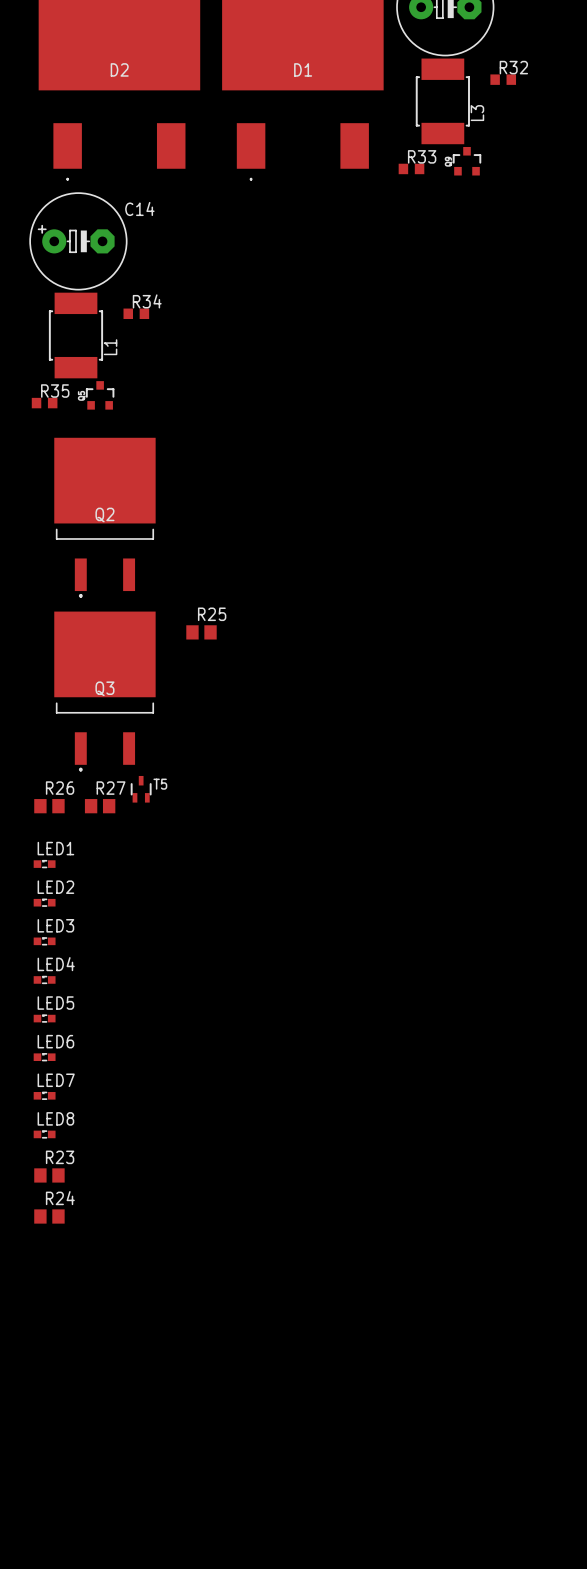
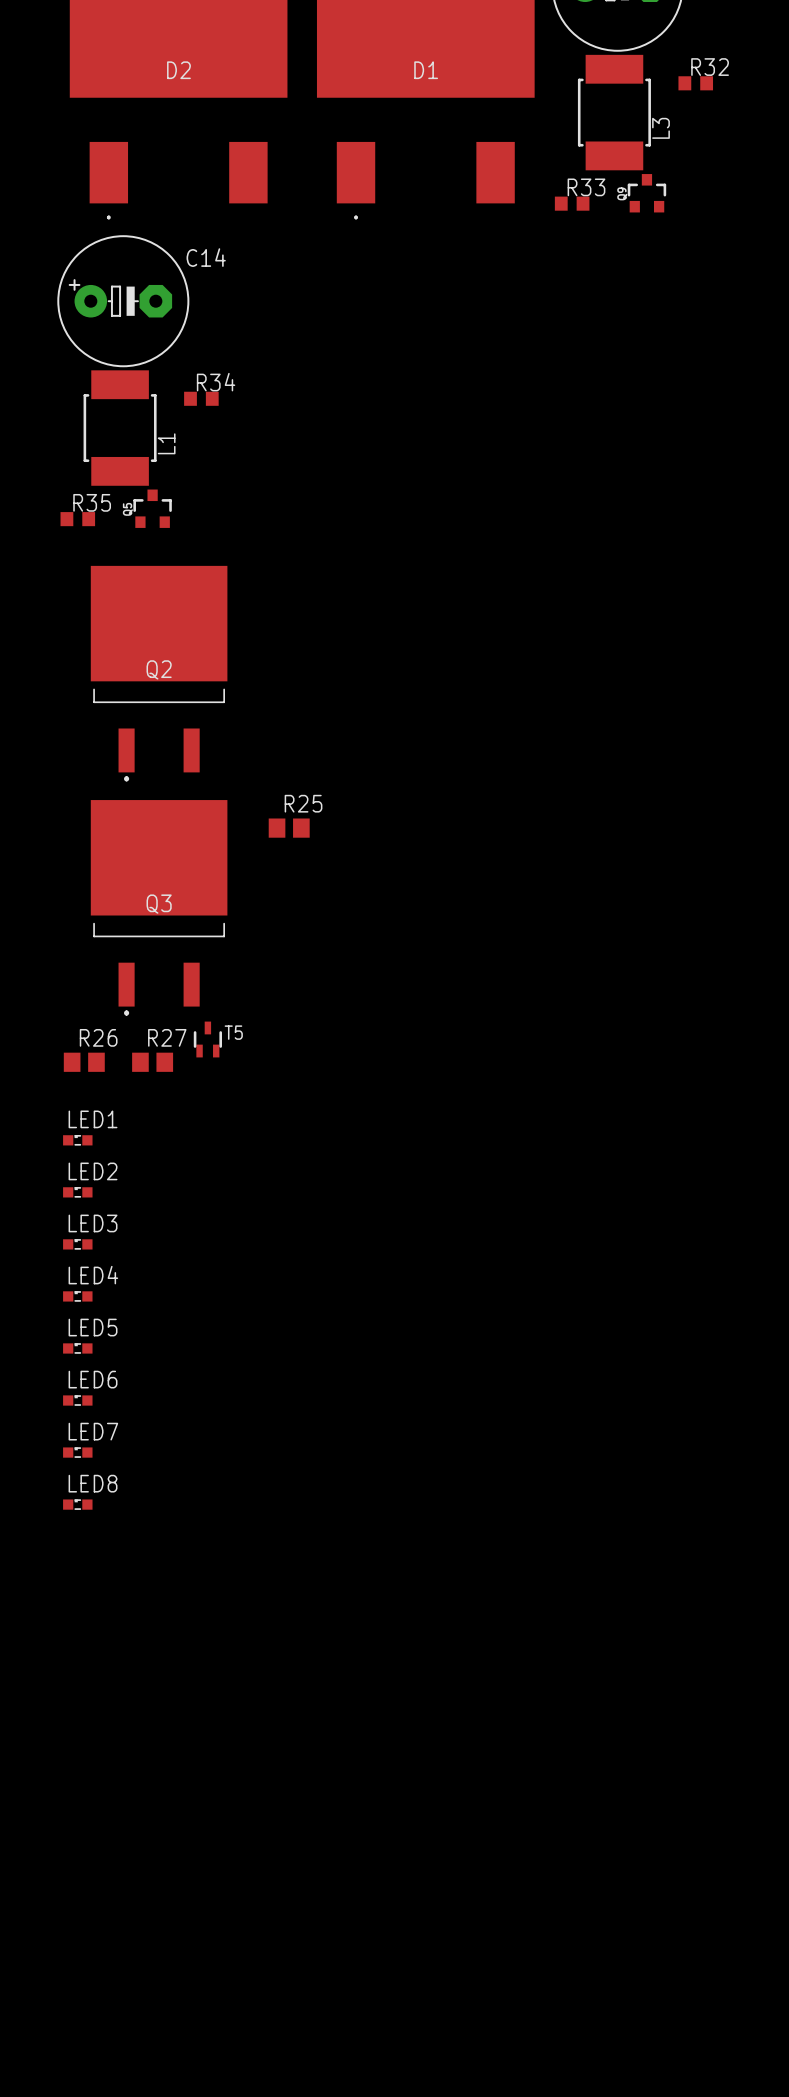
R23: (49, 1175) -> none
R24: (49, 1216) -> none

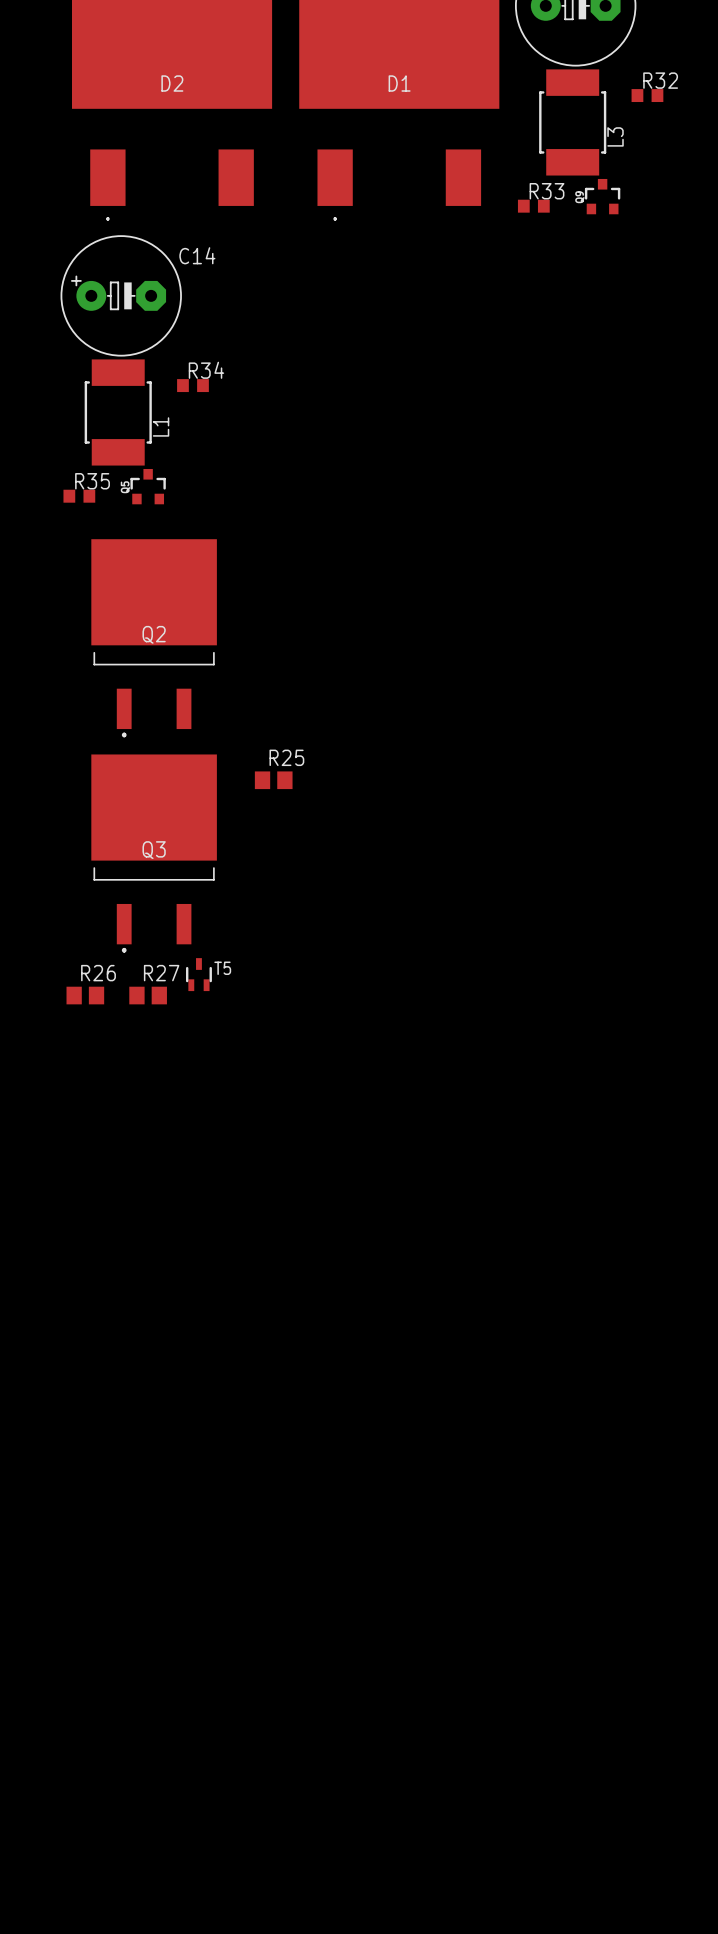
LED1: (77, 1140) -> none
LED2: (77, 1192) -> none
LED3: (77, 1244) -> none
LED4: (77, 1296) -> none
LED5: (77, 1348) -> none
LED6: (77, 1400) -> none
LED7: (77, 1452) -> none
LED8: (77, 1504) -> none

